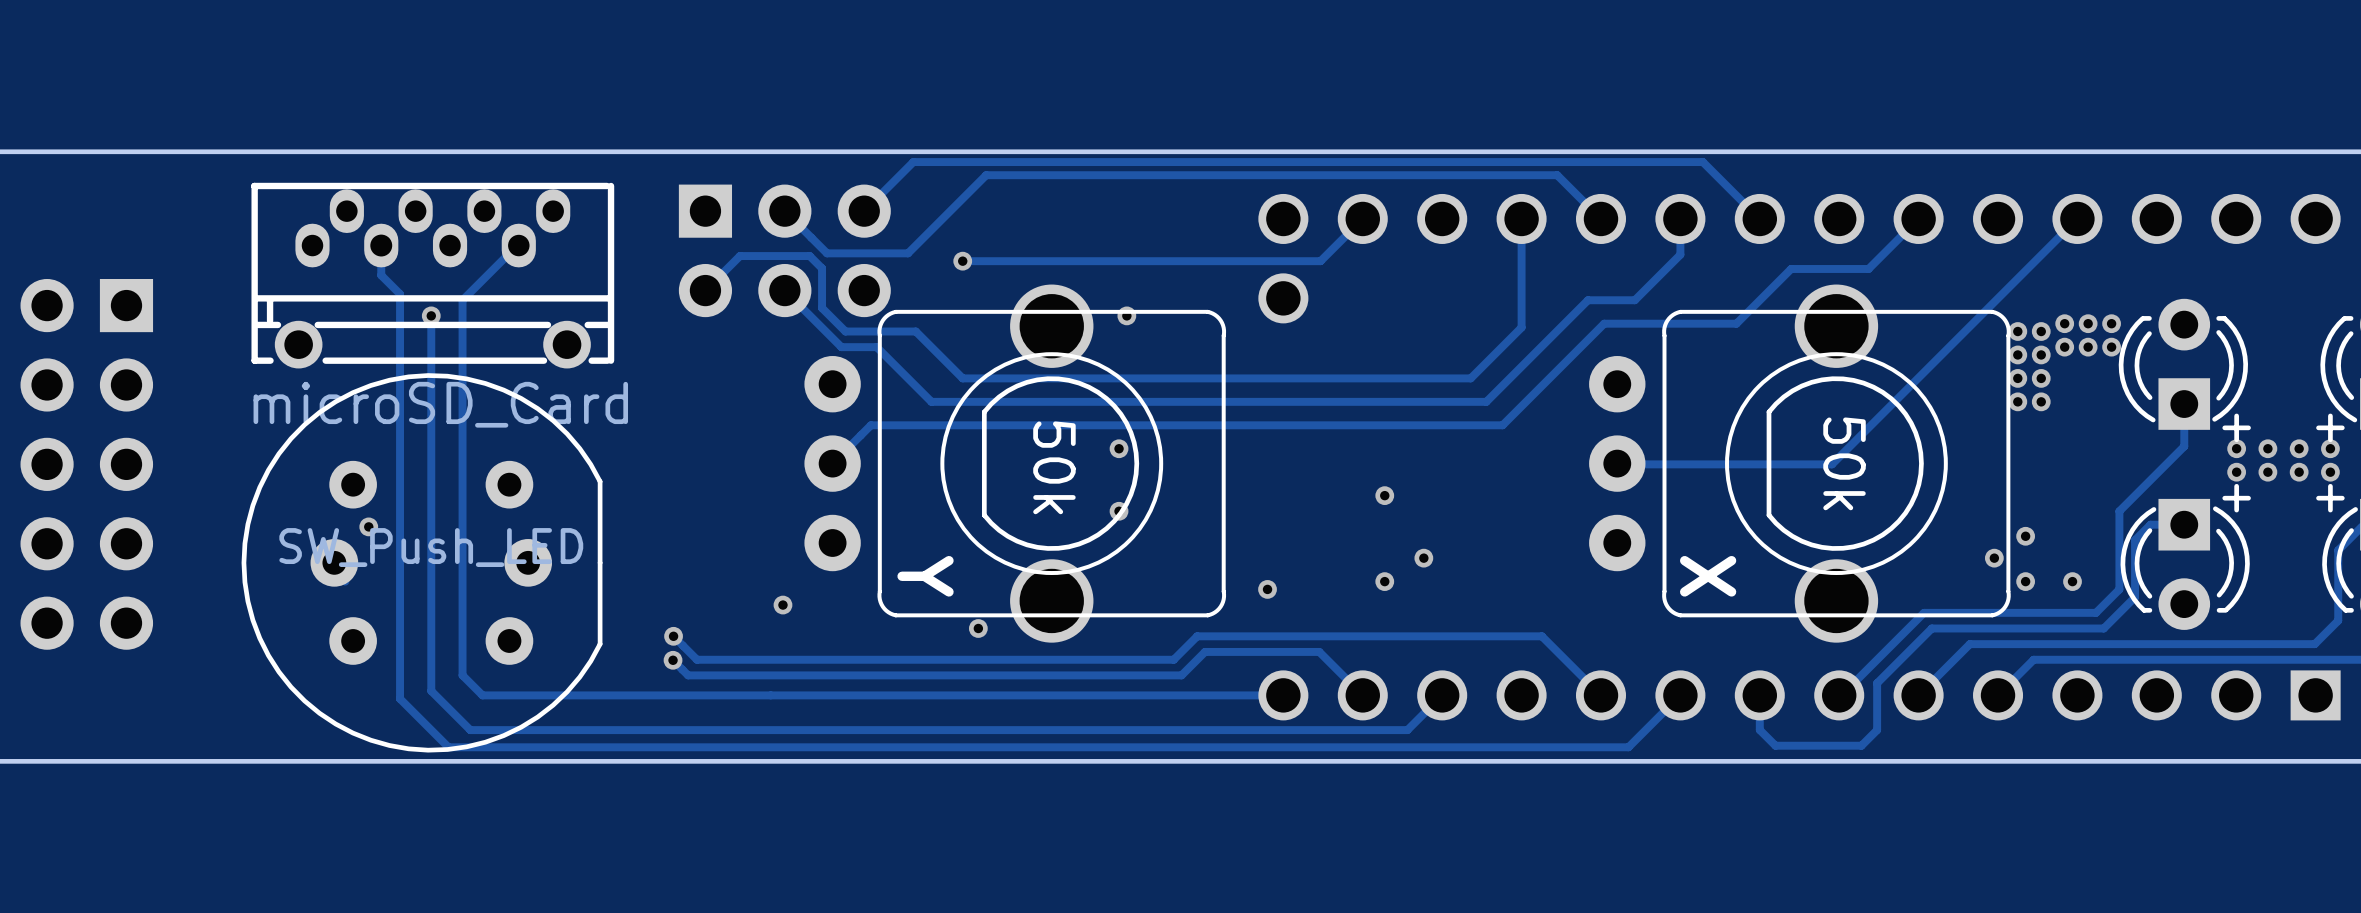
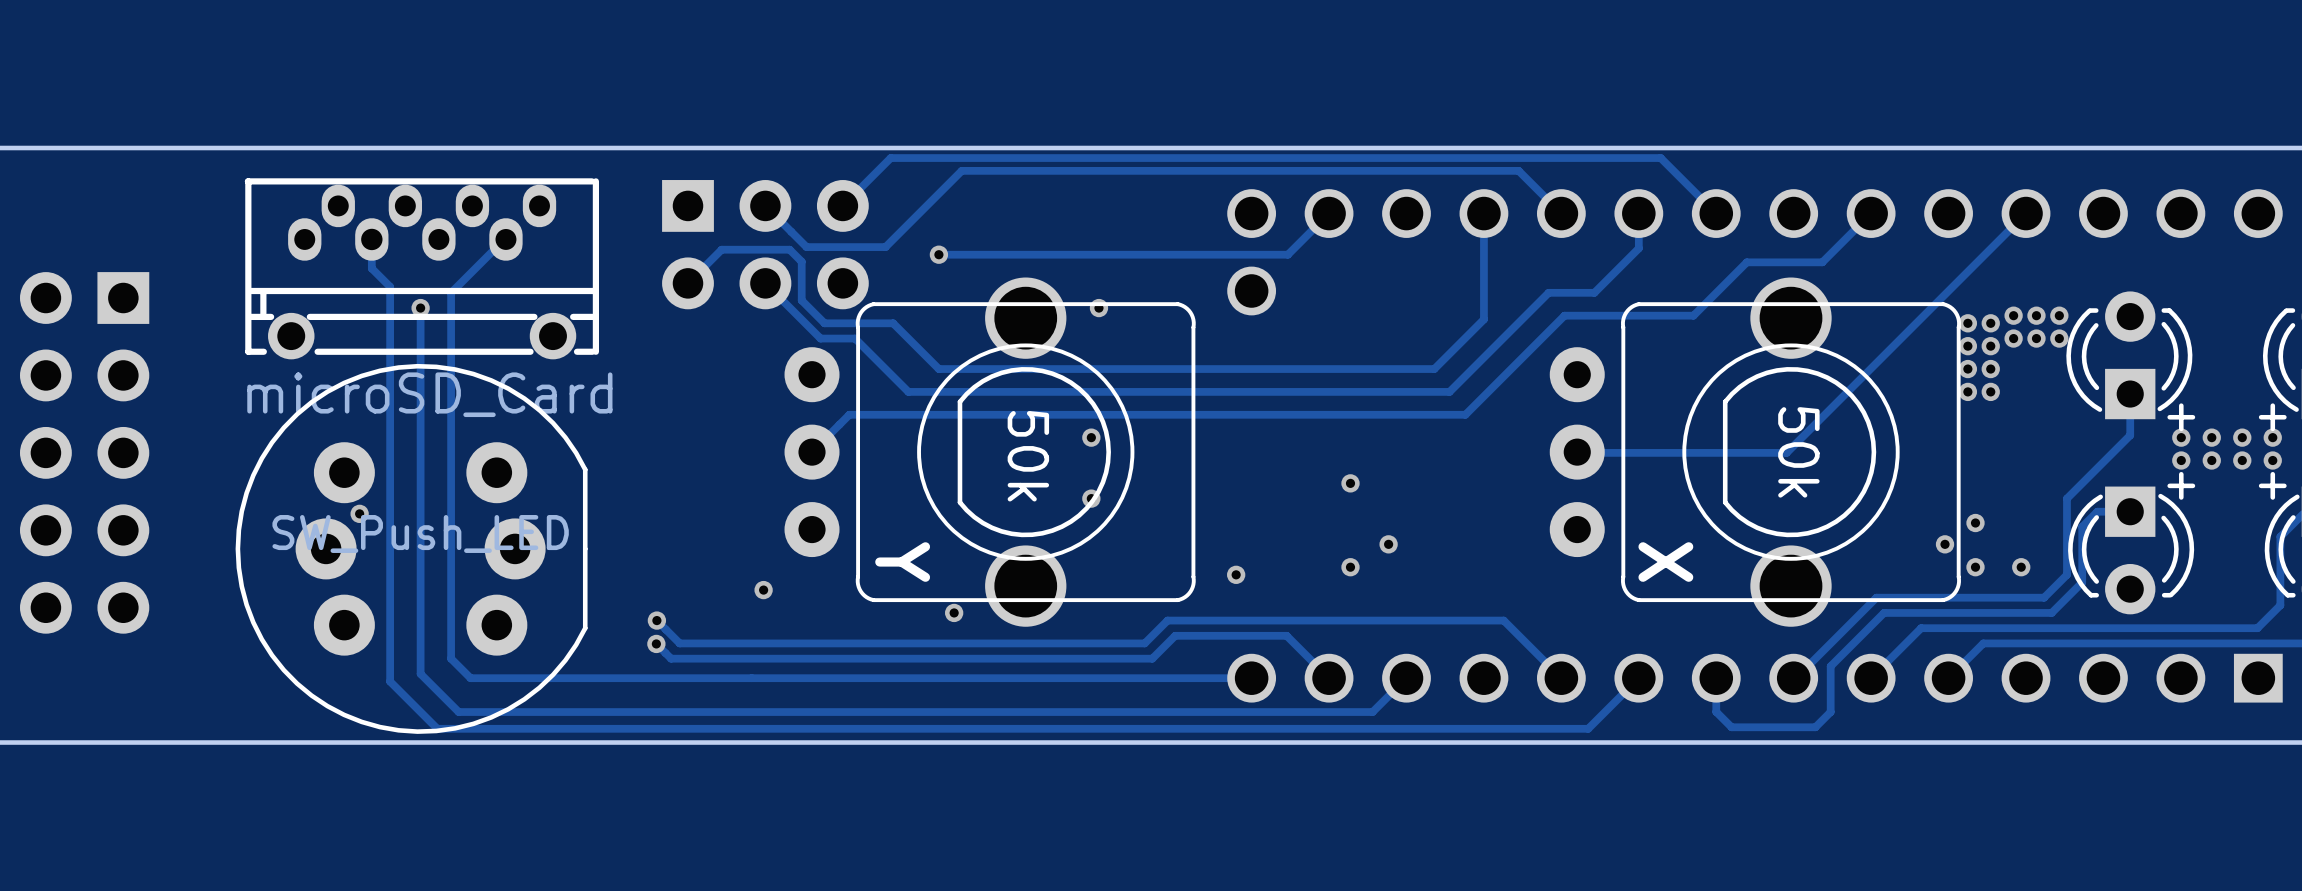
part footprint: [241, 373, 603, 753] -> [235, 363, 588, 734]

